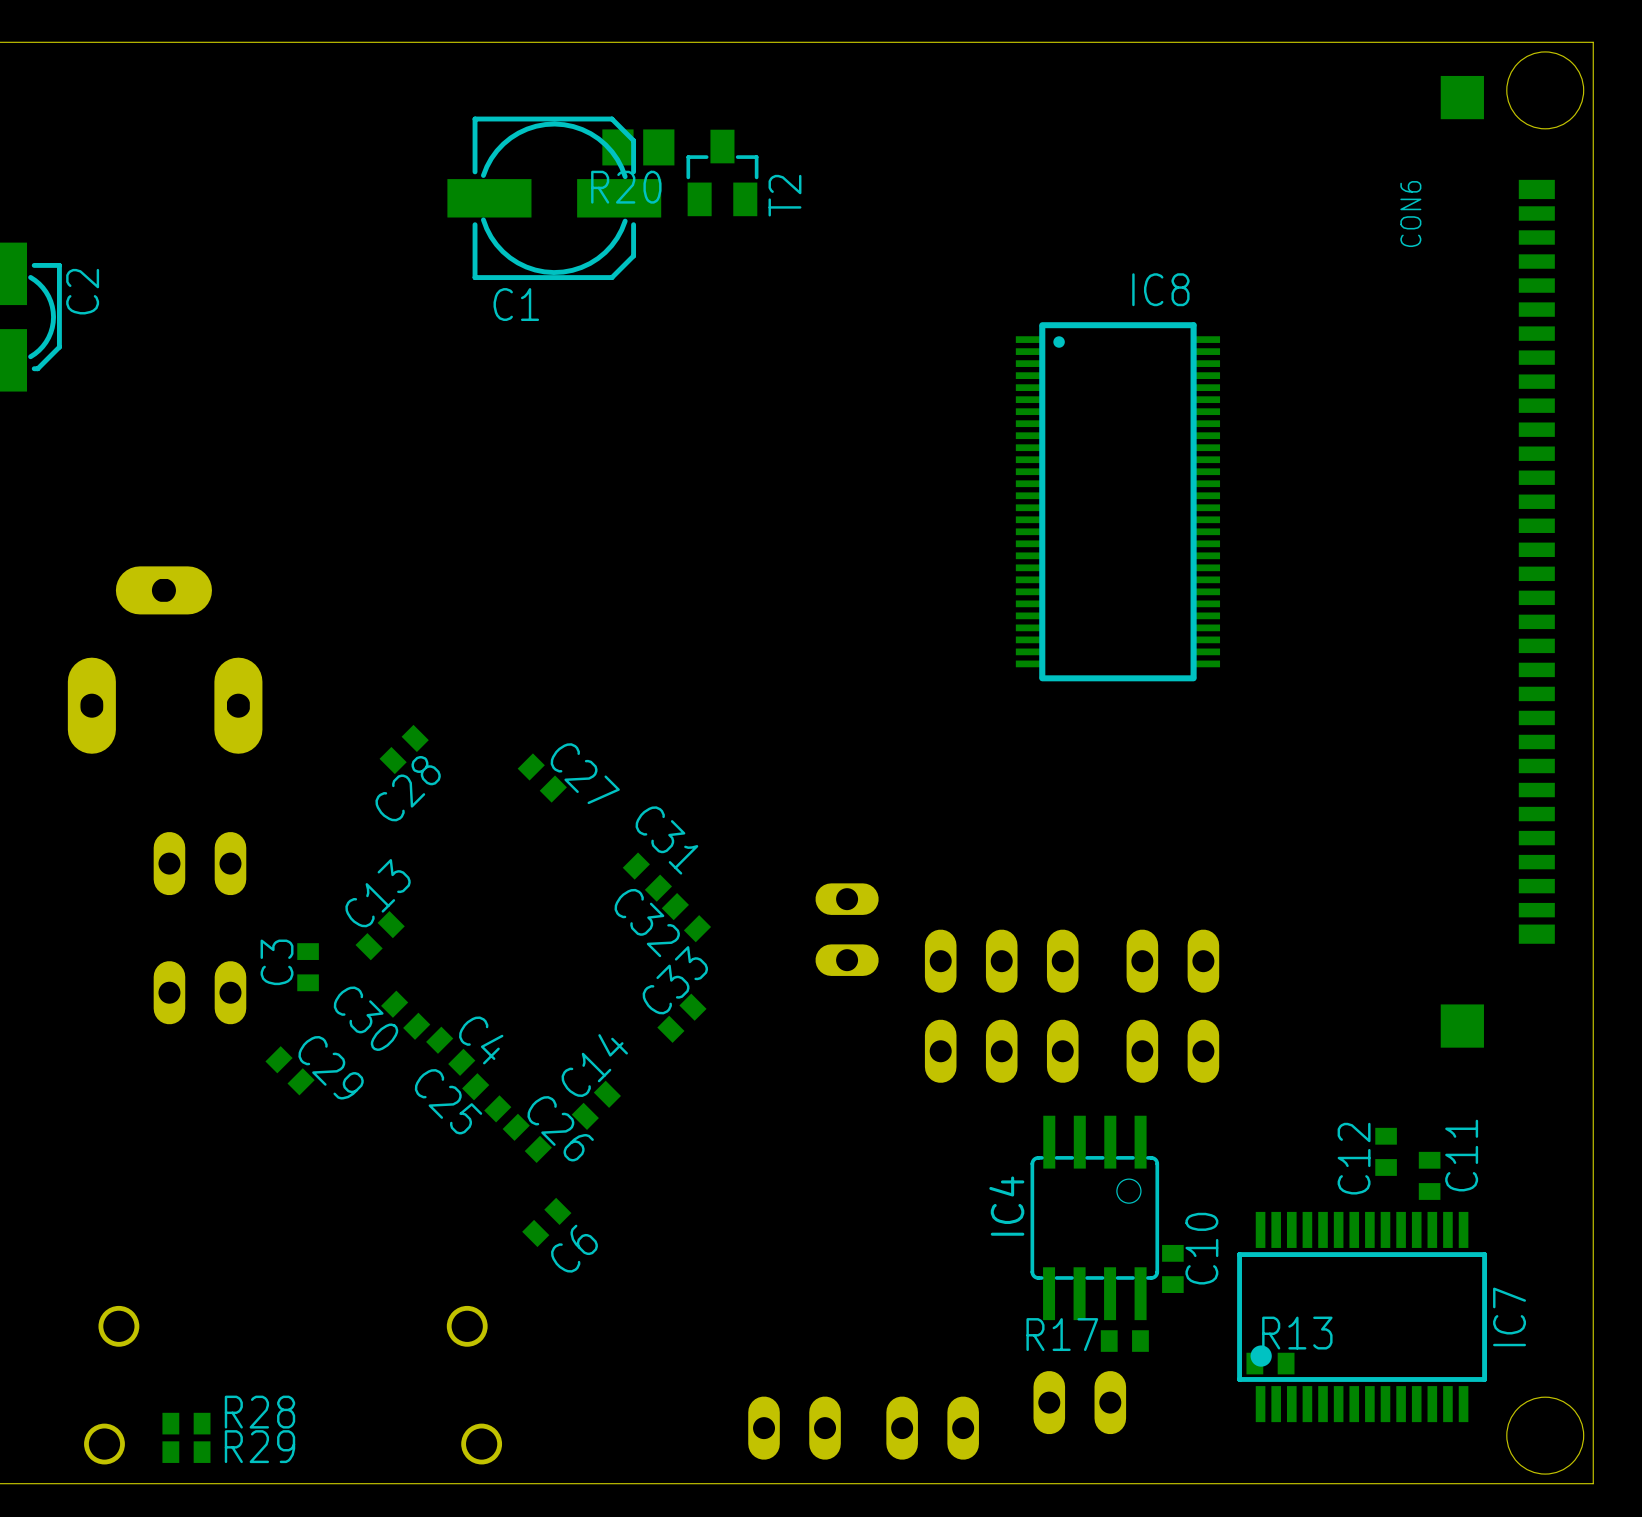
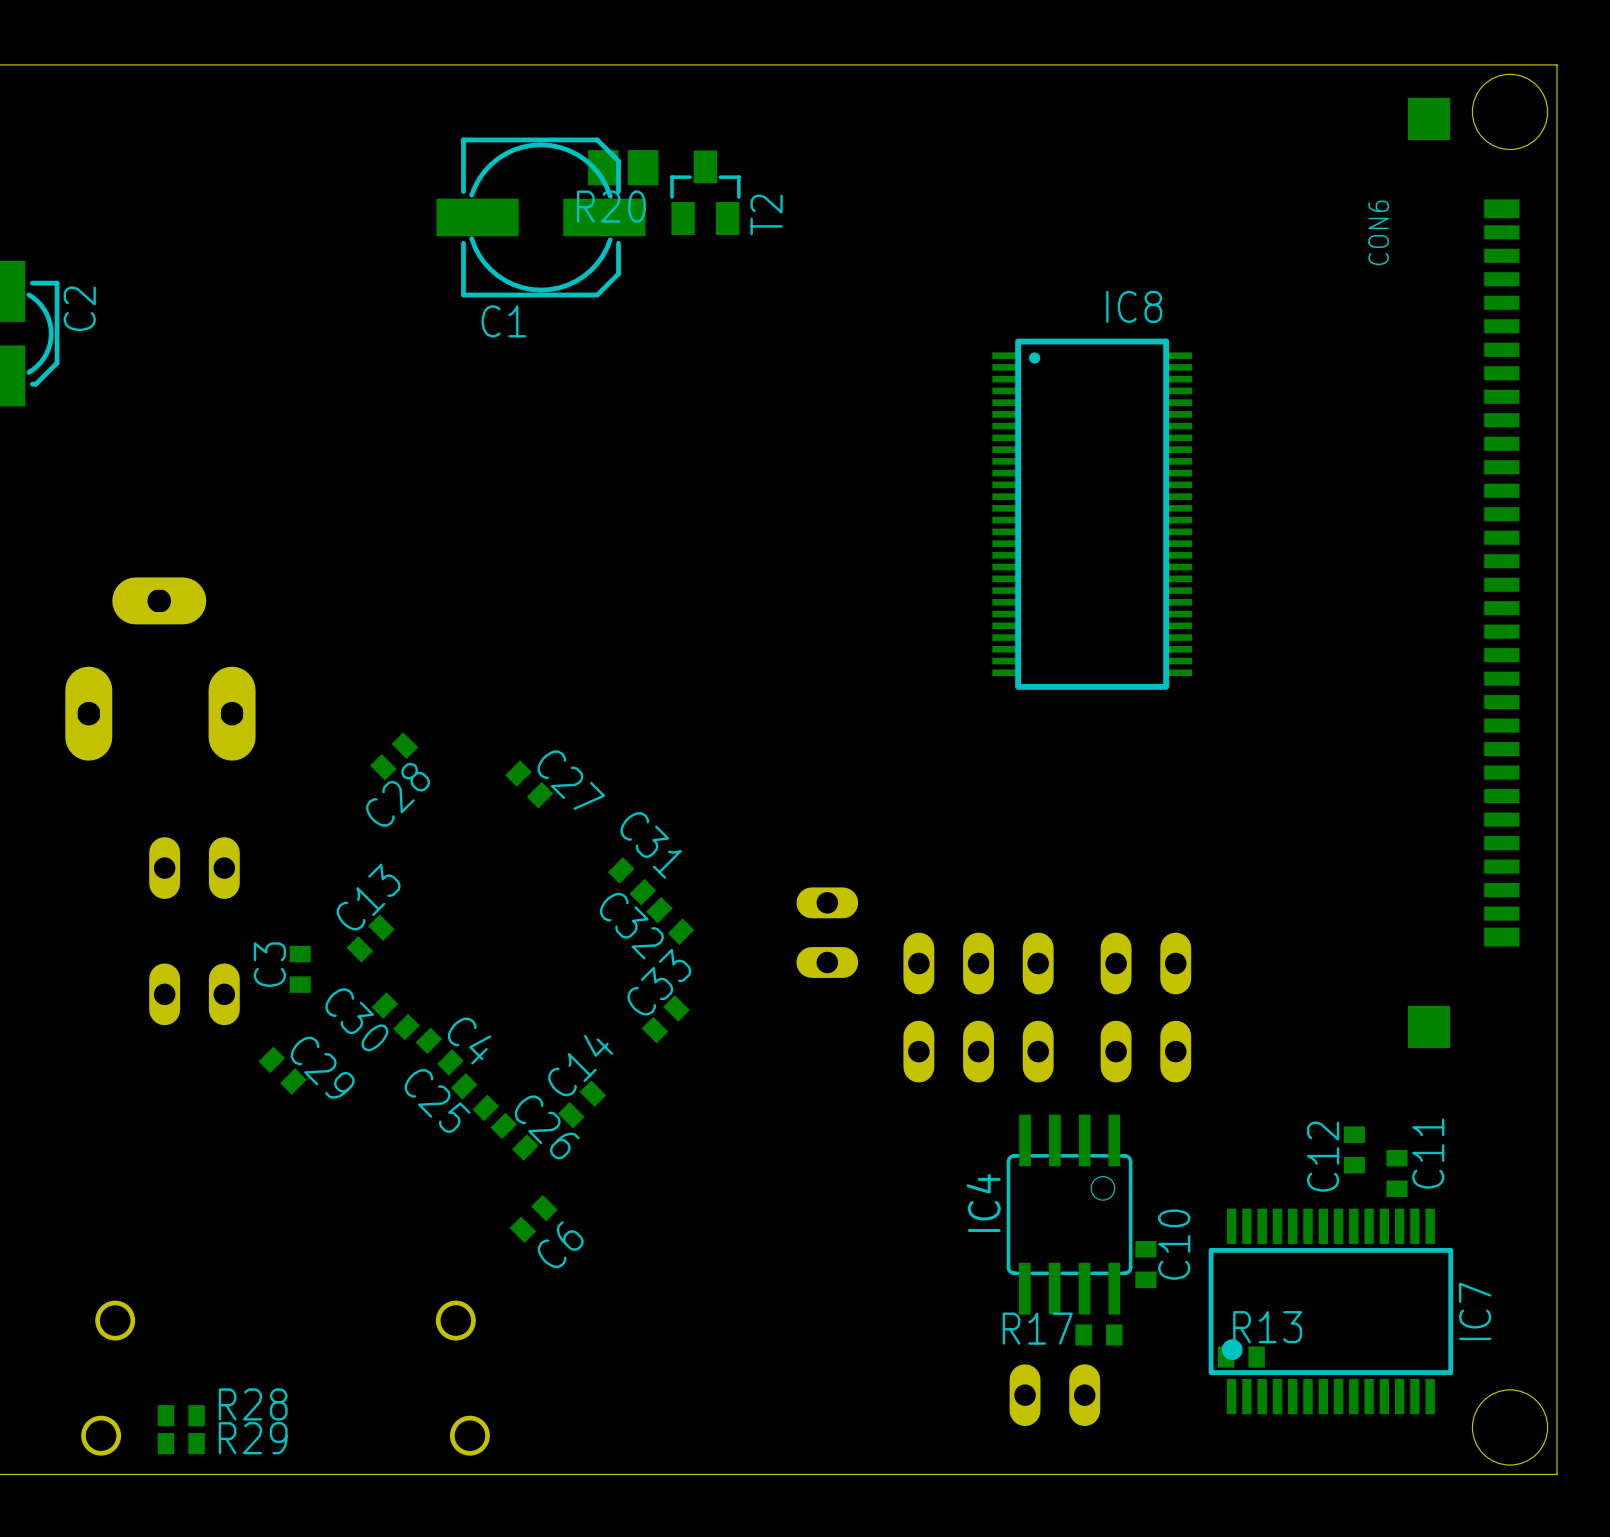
part: (794, 1428) -> none
part: (932, 1428) -> none

